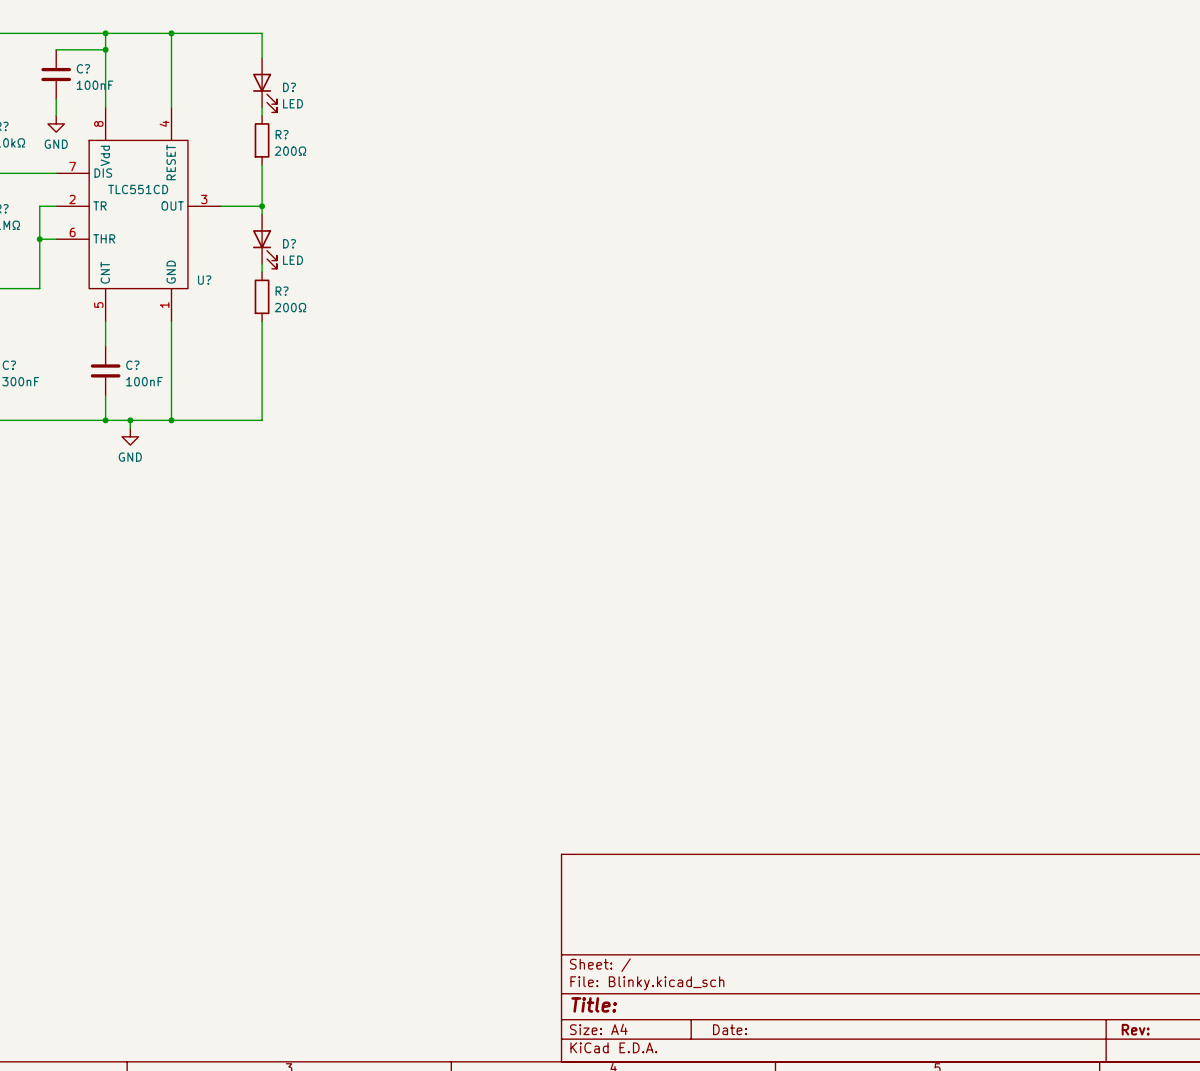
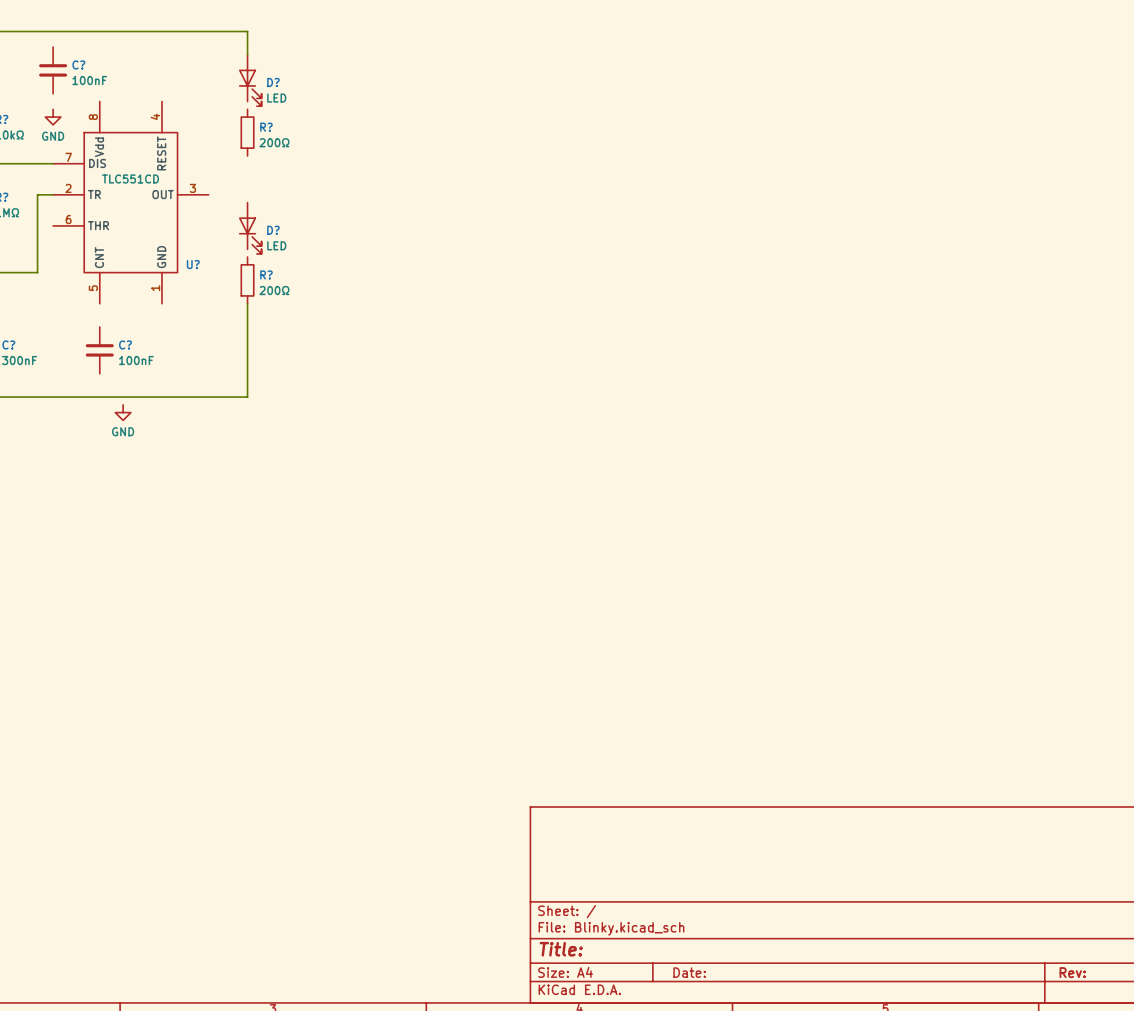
wire: (105, 33) (105, 107) -> none
junction: (105, 33) -> none
wire: (171, 33) (171, 107) -> none
junction: (171, 33) -> none
wire: (56, 49) (105, 49) -> none
junction: (105, 49) -> none
wire: (56, 99) (56, 115) -> none
wire: (262, 107) (262, 115) -> none
wire: (262, 165) (262, 214) -> none
wire: (220, 206) (262, 206) -> none
junction: (262, 206) -> none
wire: (39, 239) (56, 239) -> none
junction: (39, 239) -> none
wire: (262, 263) (262, 272) -> none
wire: (105, 321) (105, 346) -> none
wire: (171, 321) (171, 420) -> none
wire: (105, 395) (105, 420) -> none
junction: (105, 420) -> none
wire: (130, 420) (130, 428) -> none
junction: (130, 420) -> none
junction: (171, 420) -> none

